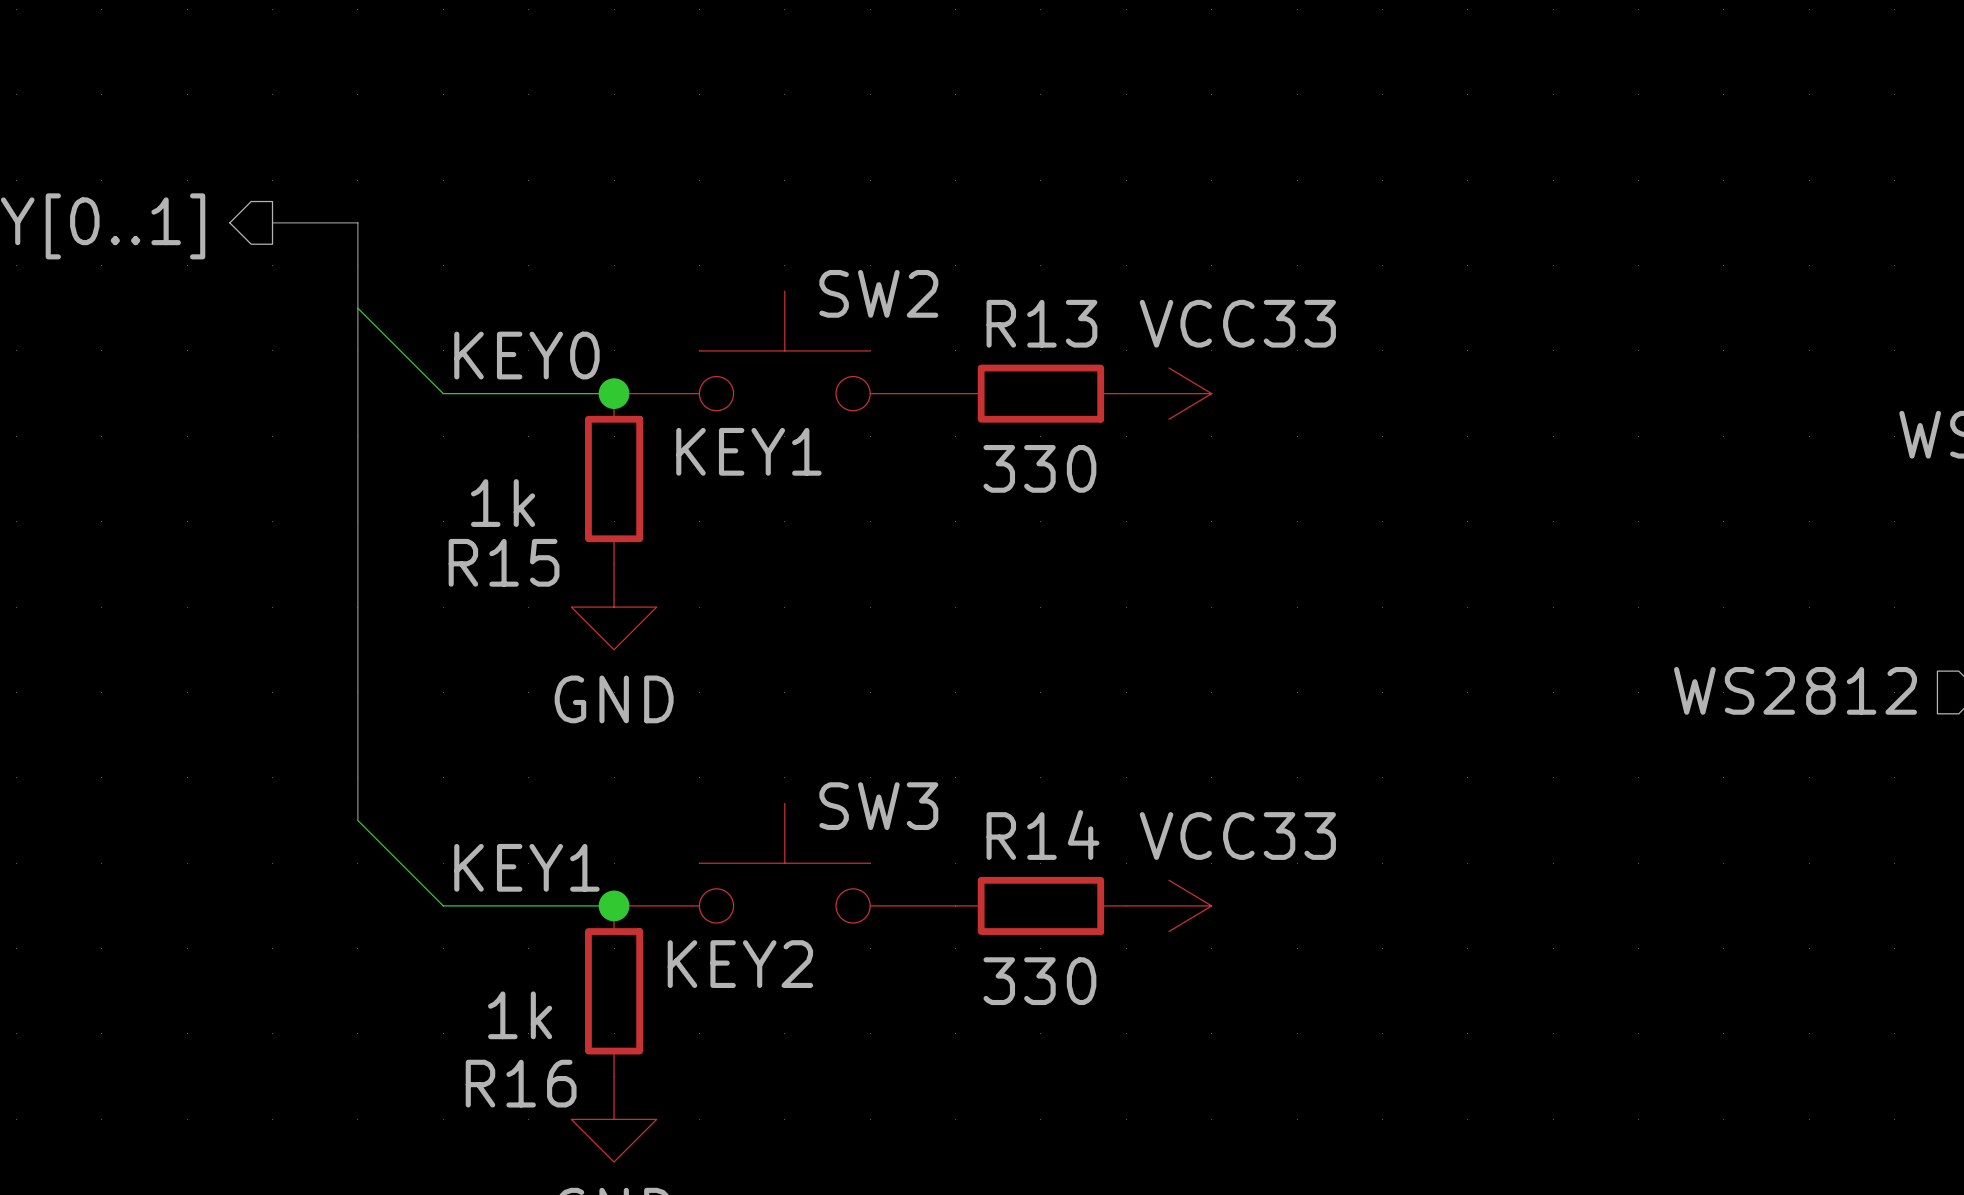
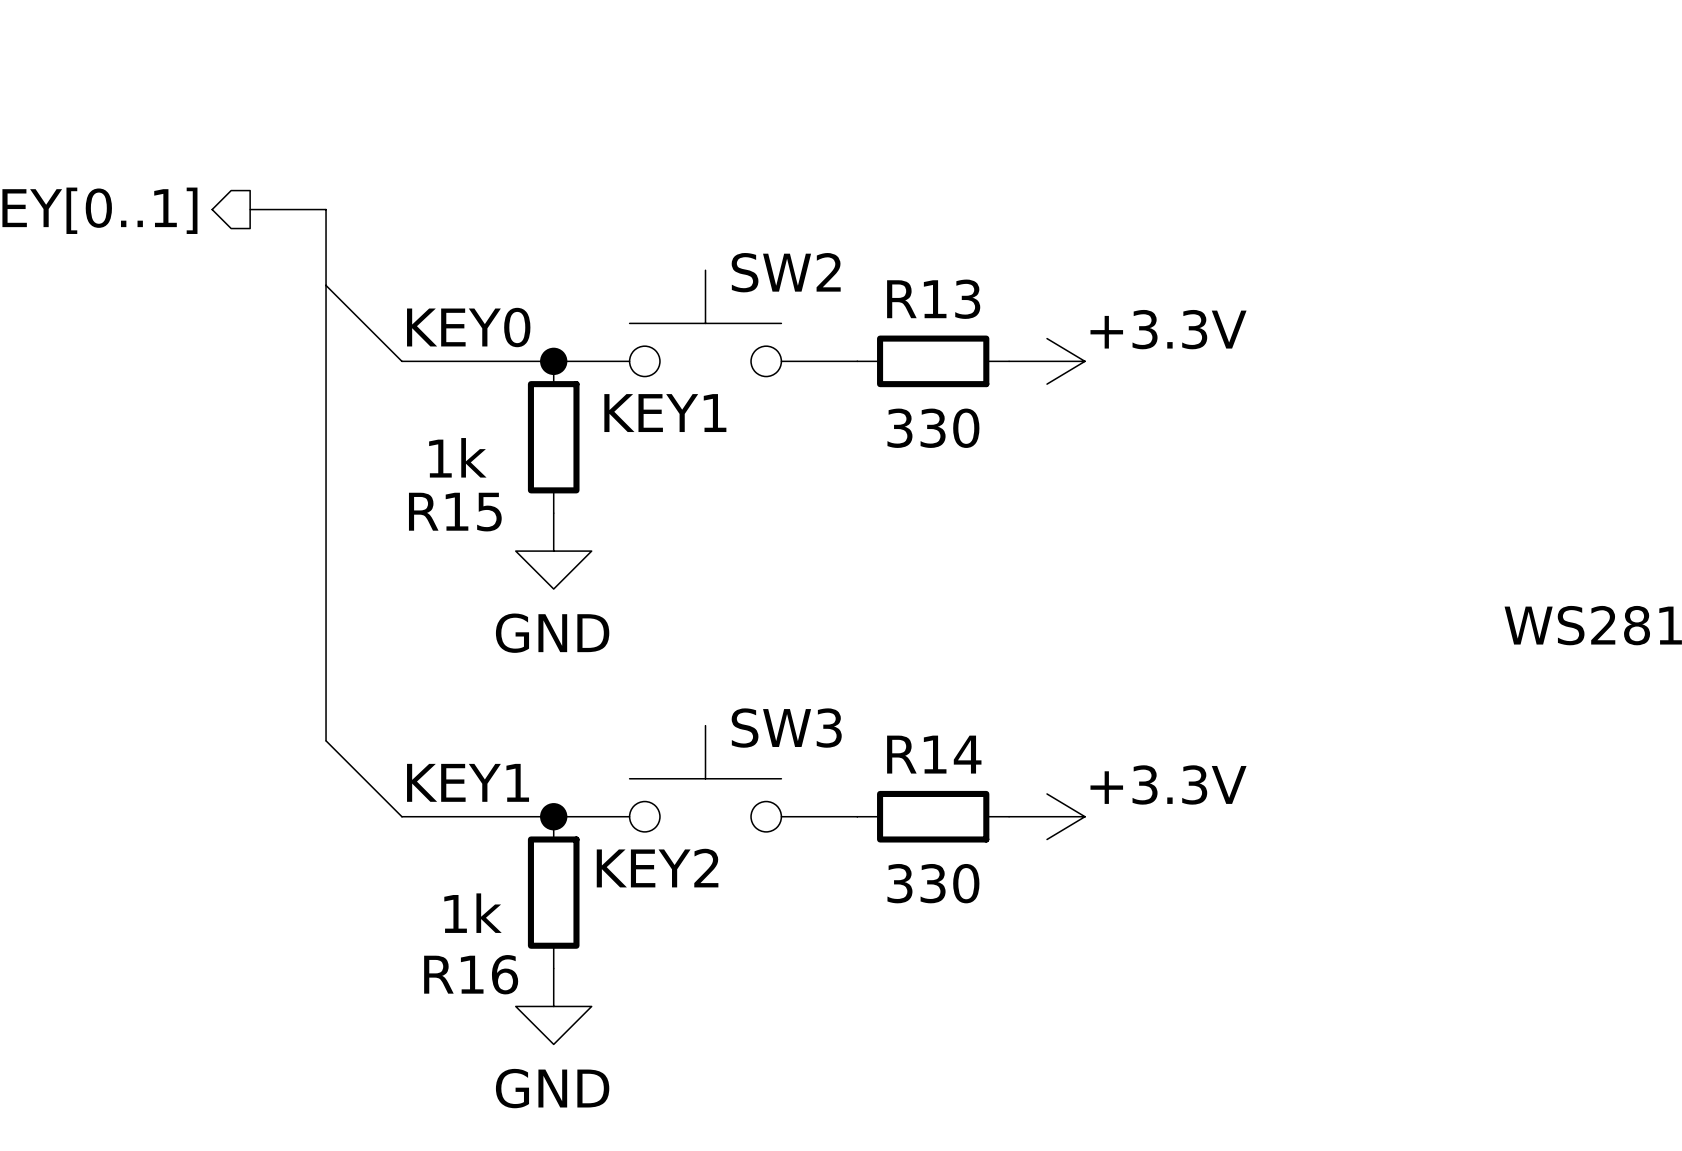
power symbol: VCC33 (1169, 393) -> +3.3V (1047, 361)
power symbol: VCC33 (1169, 905) -> +3.3V (1047, 816)

